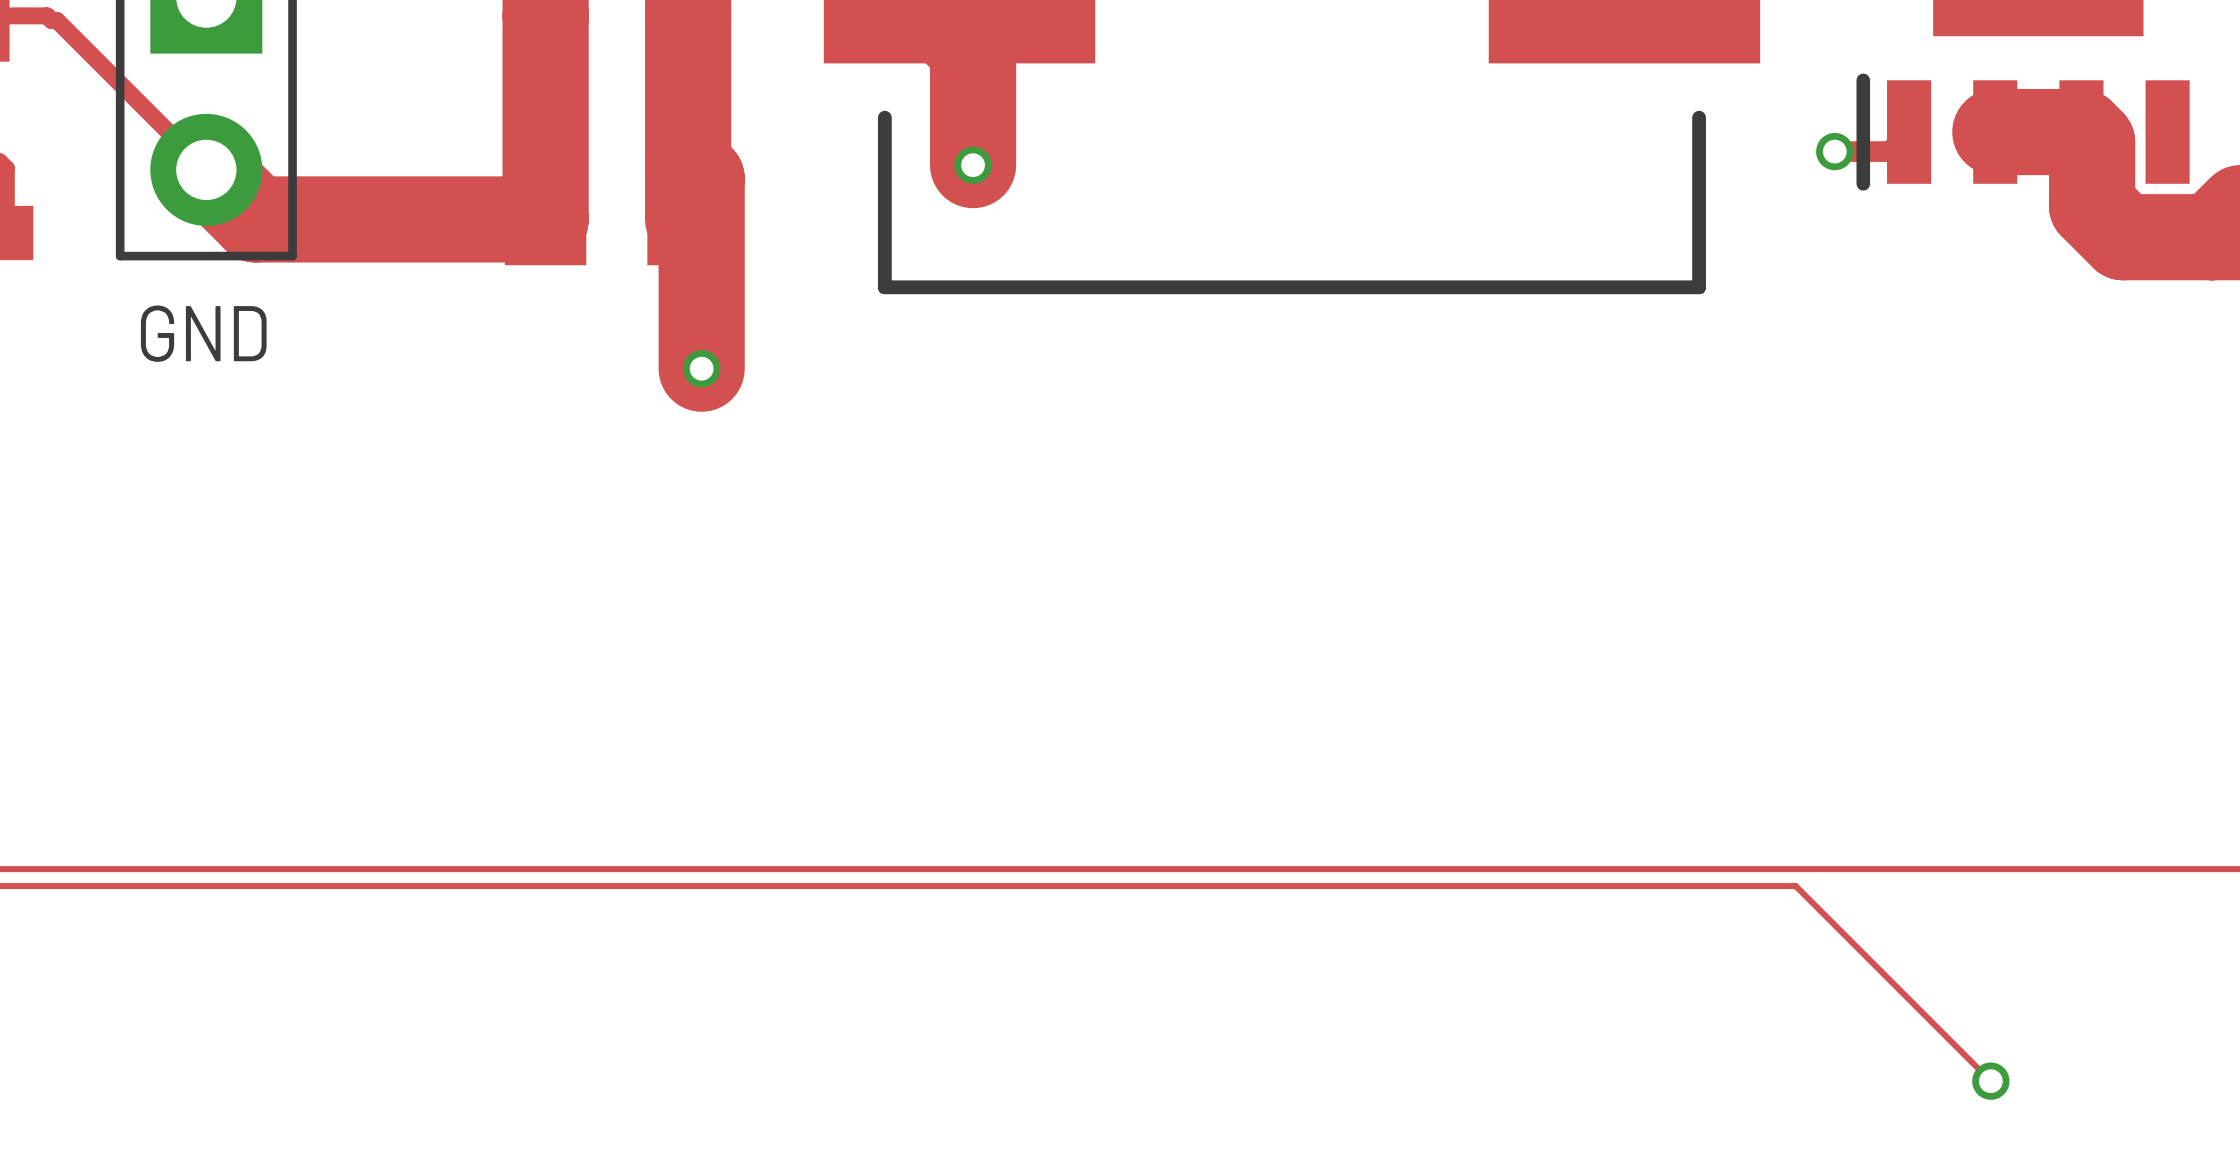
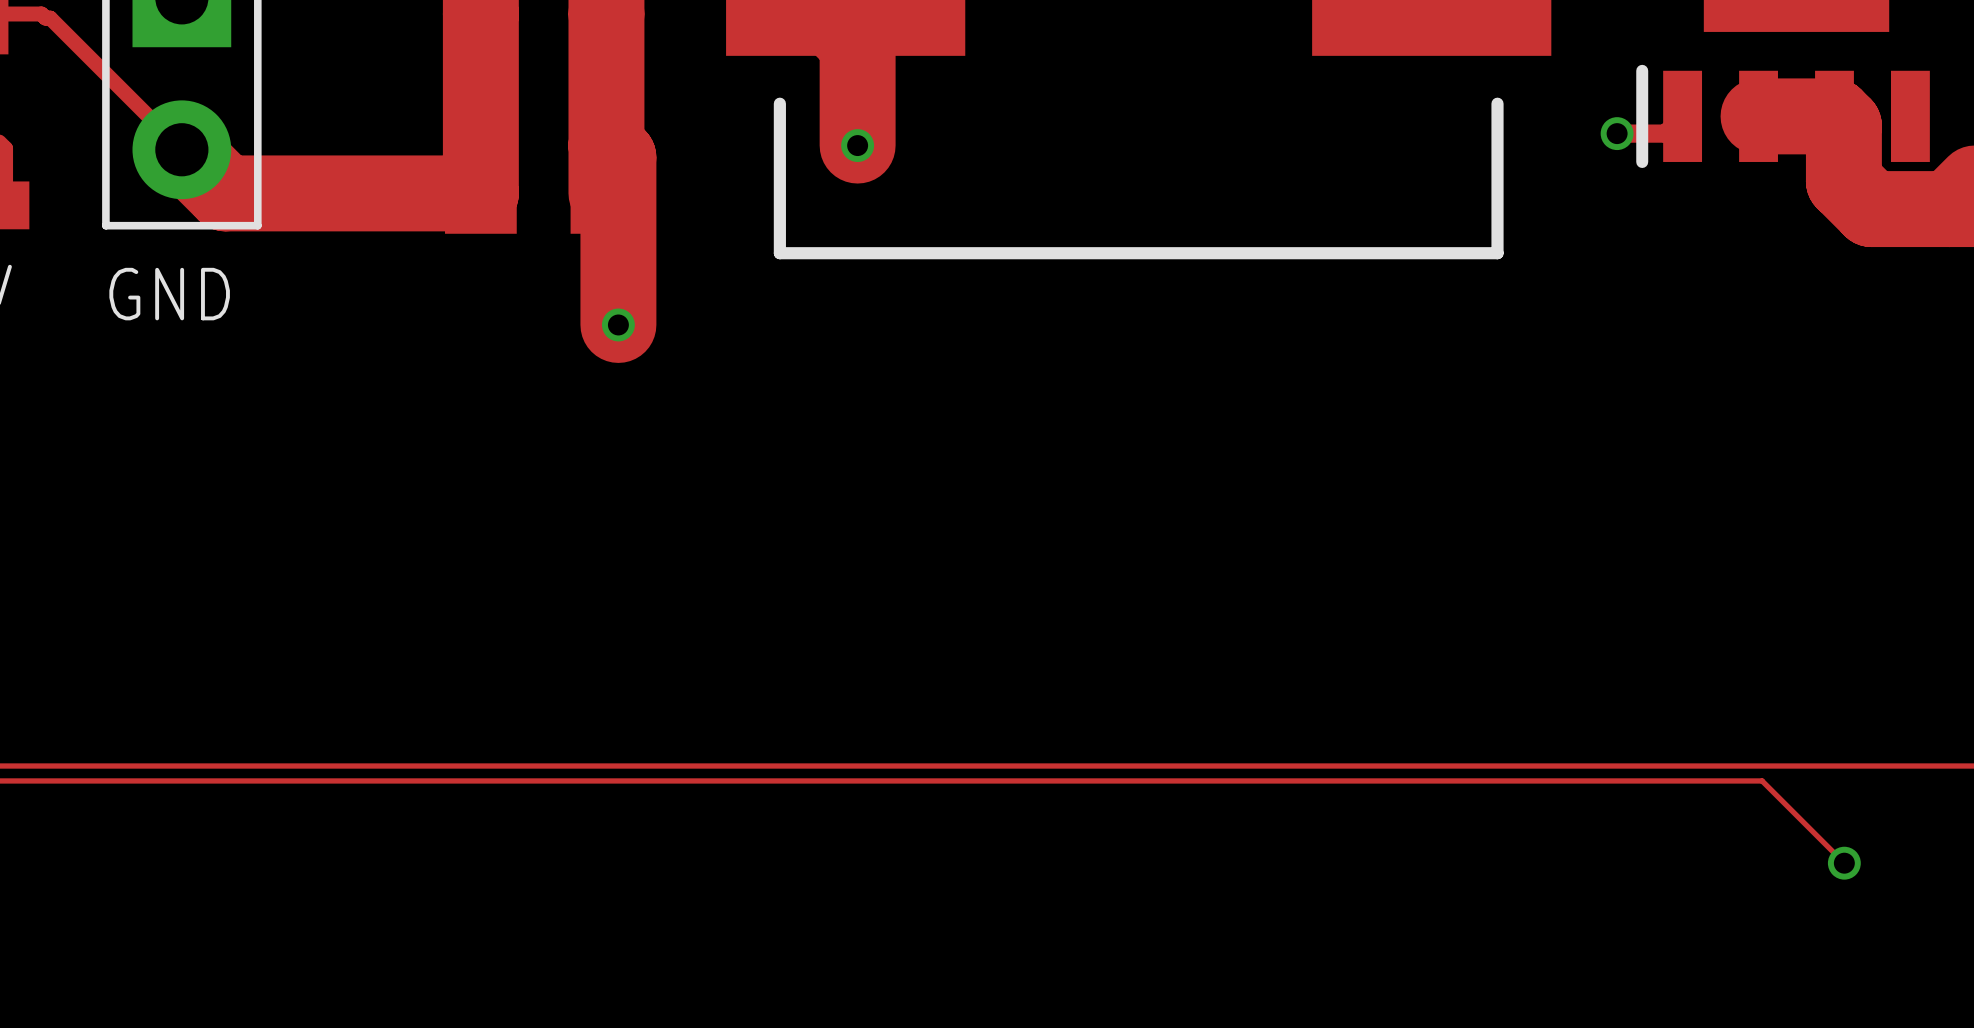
top track: (1795, 886) (1990, 1081) -> (1582, 780) (1762, 780) (1844, 863)
via position: (1990, 1081) -> (1844, 863)

